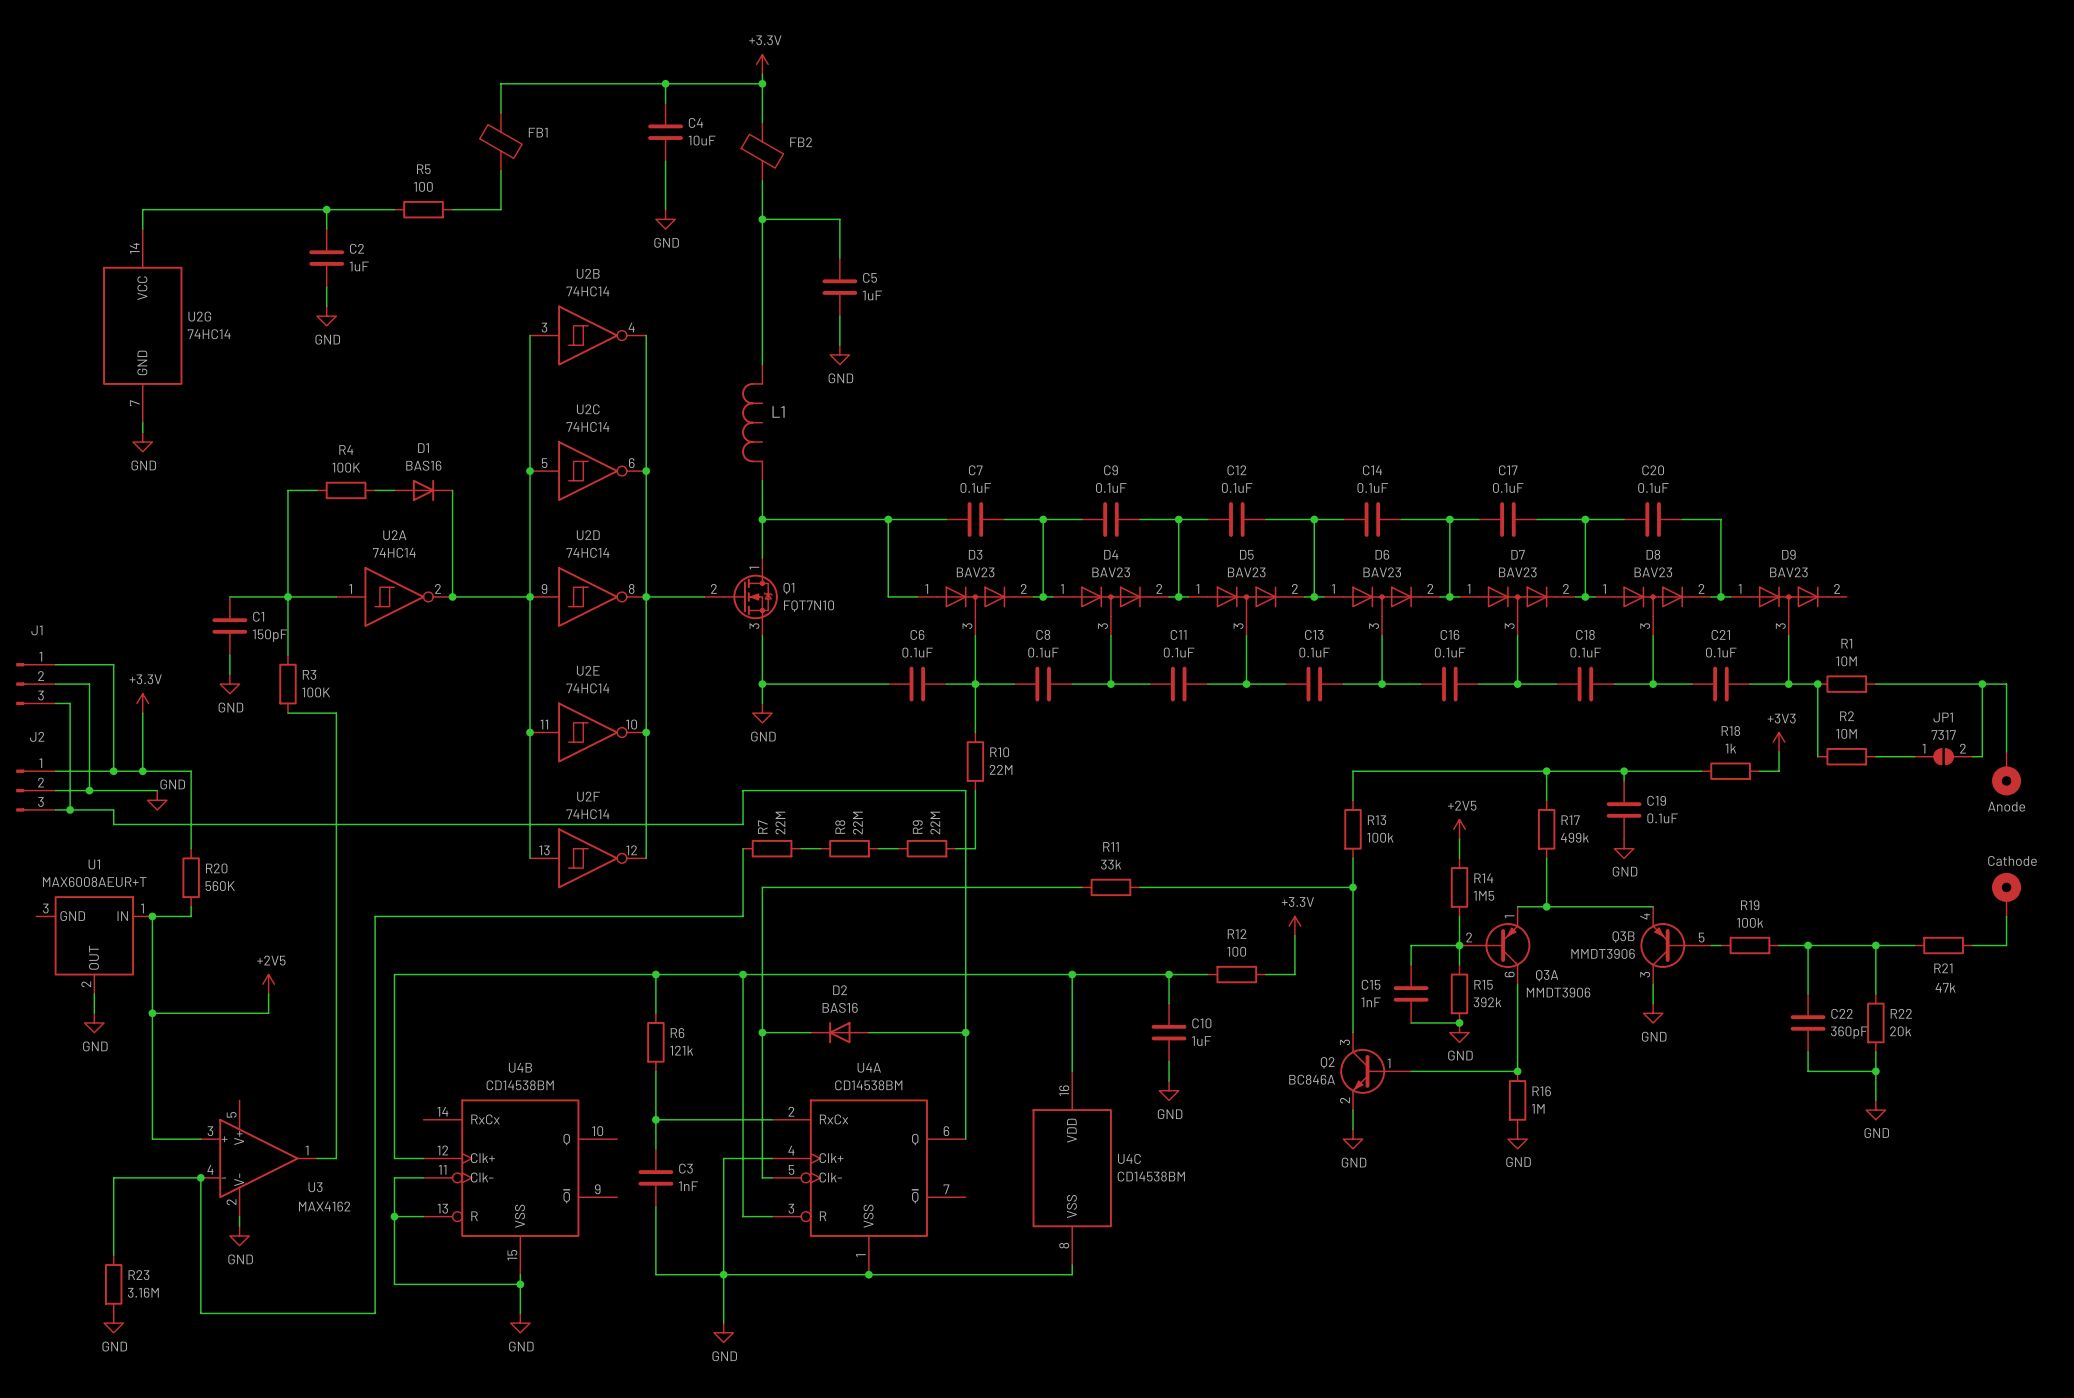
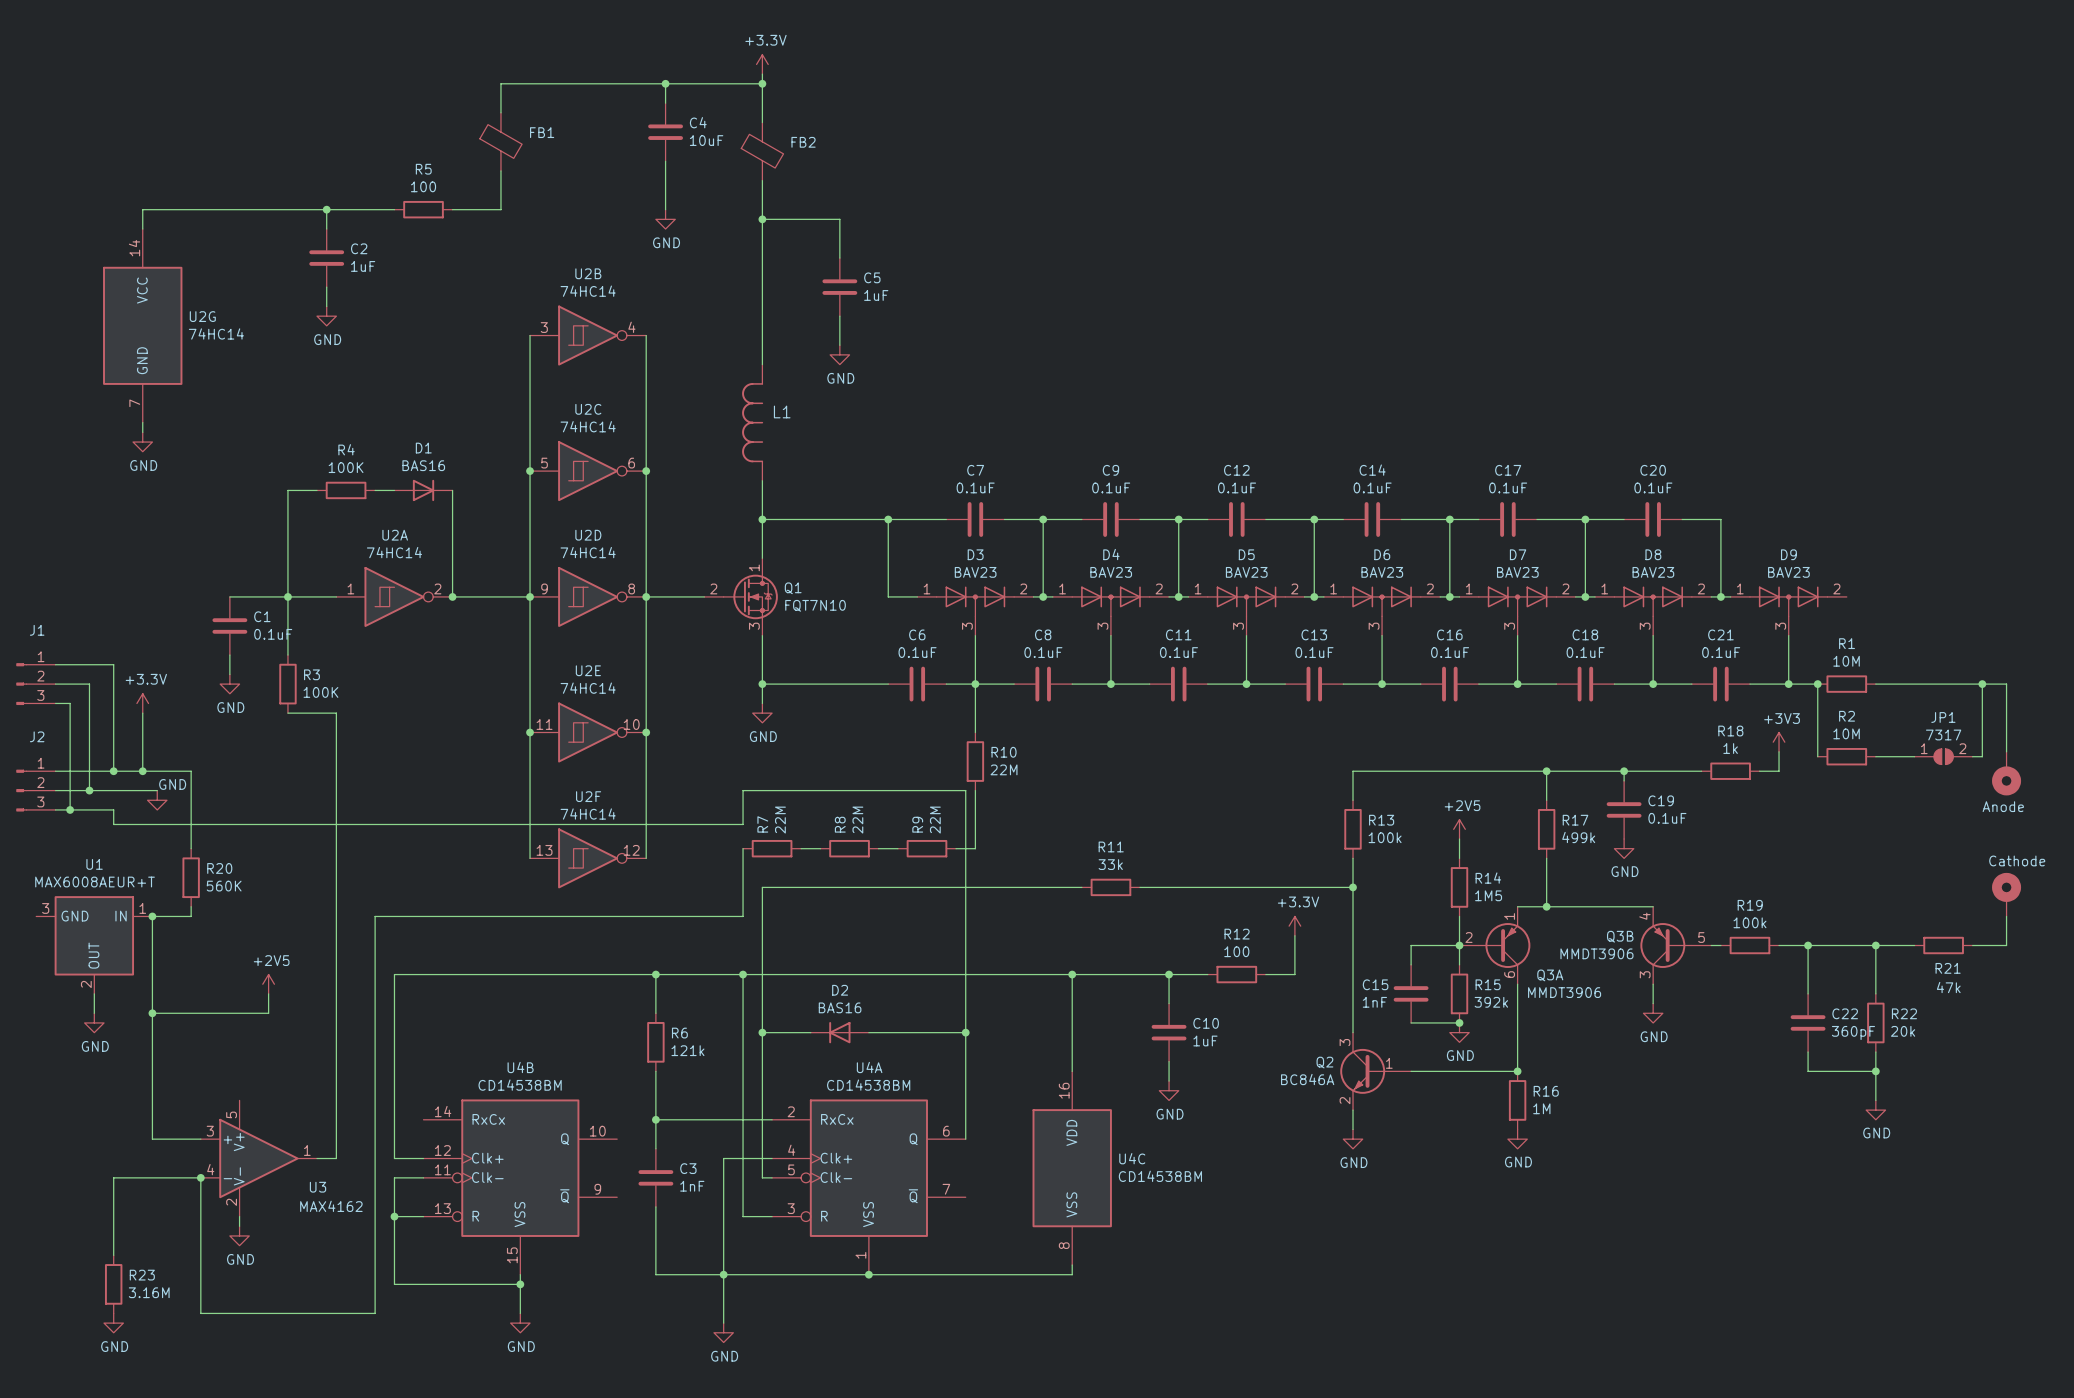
C1 value: 150pF (270, 635) -> 0.1uF (273, 634)

